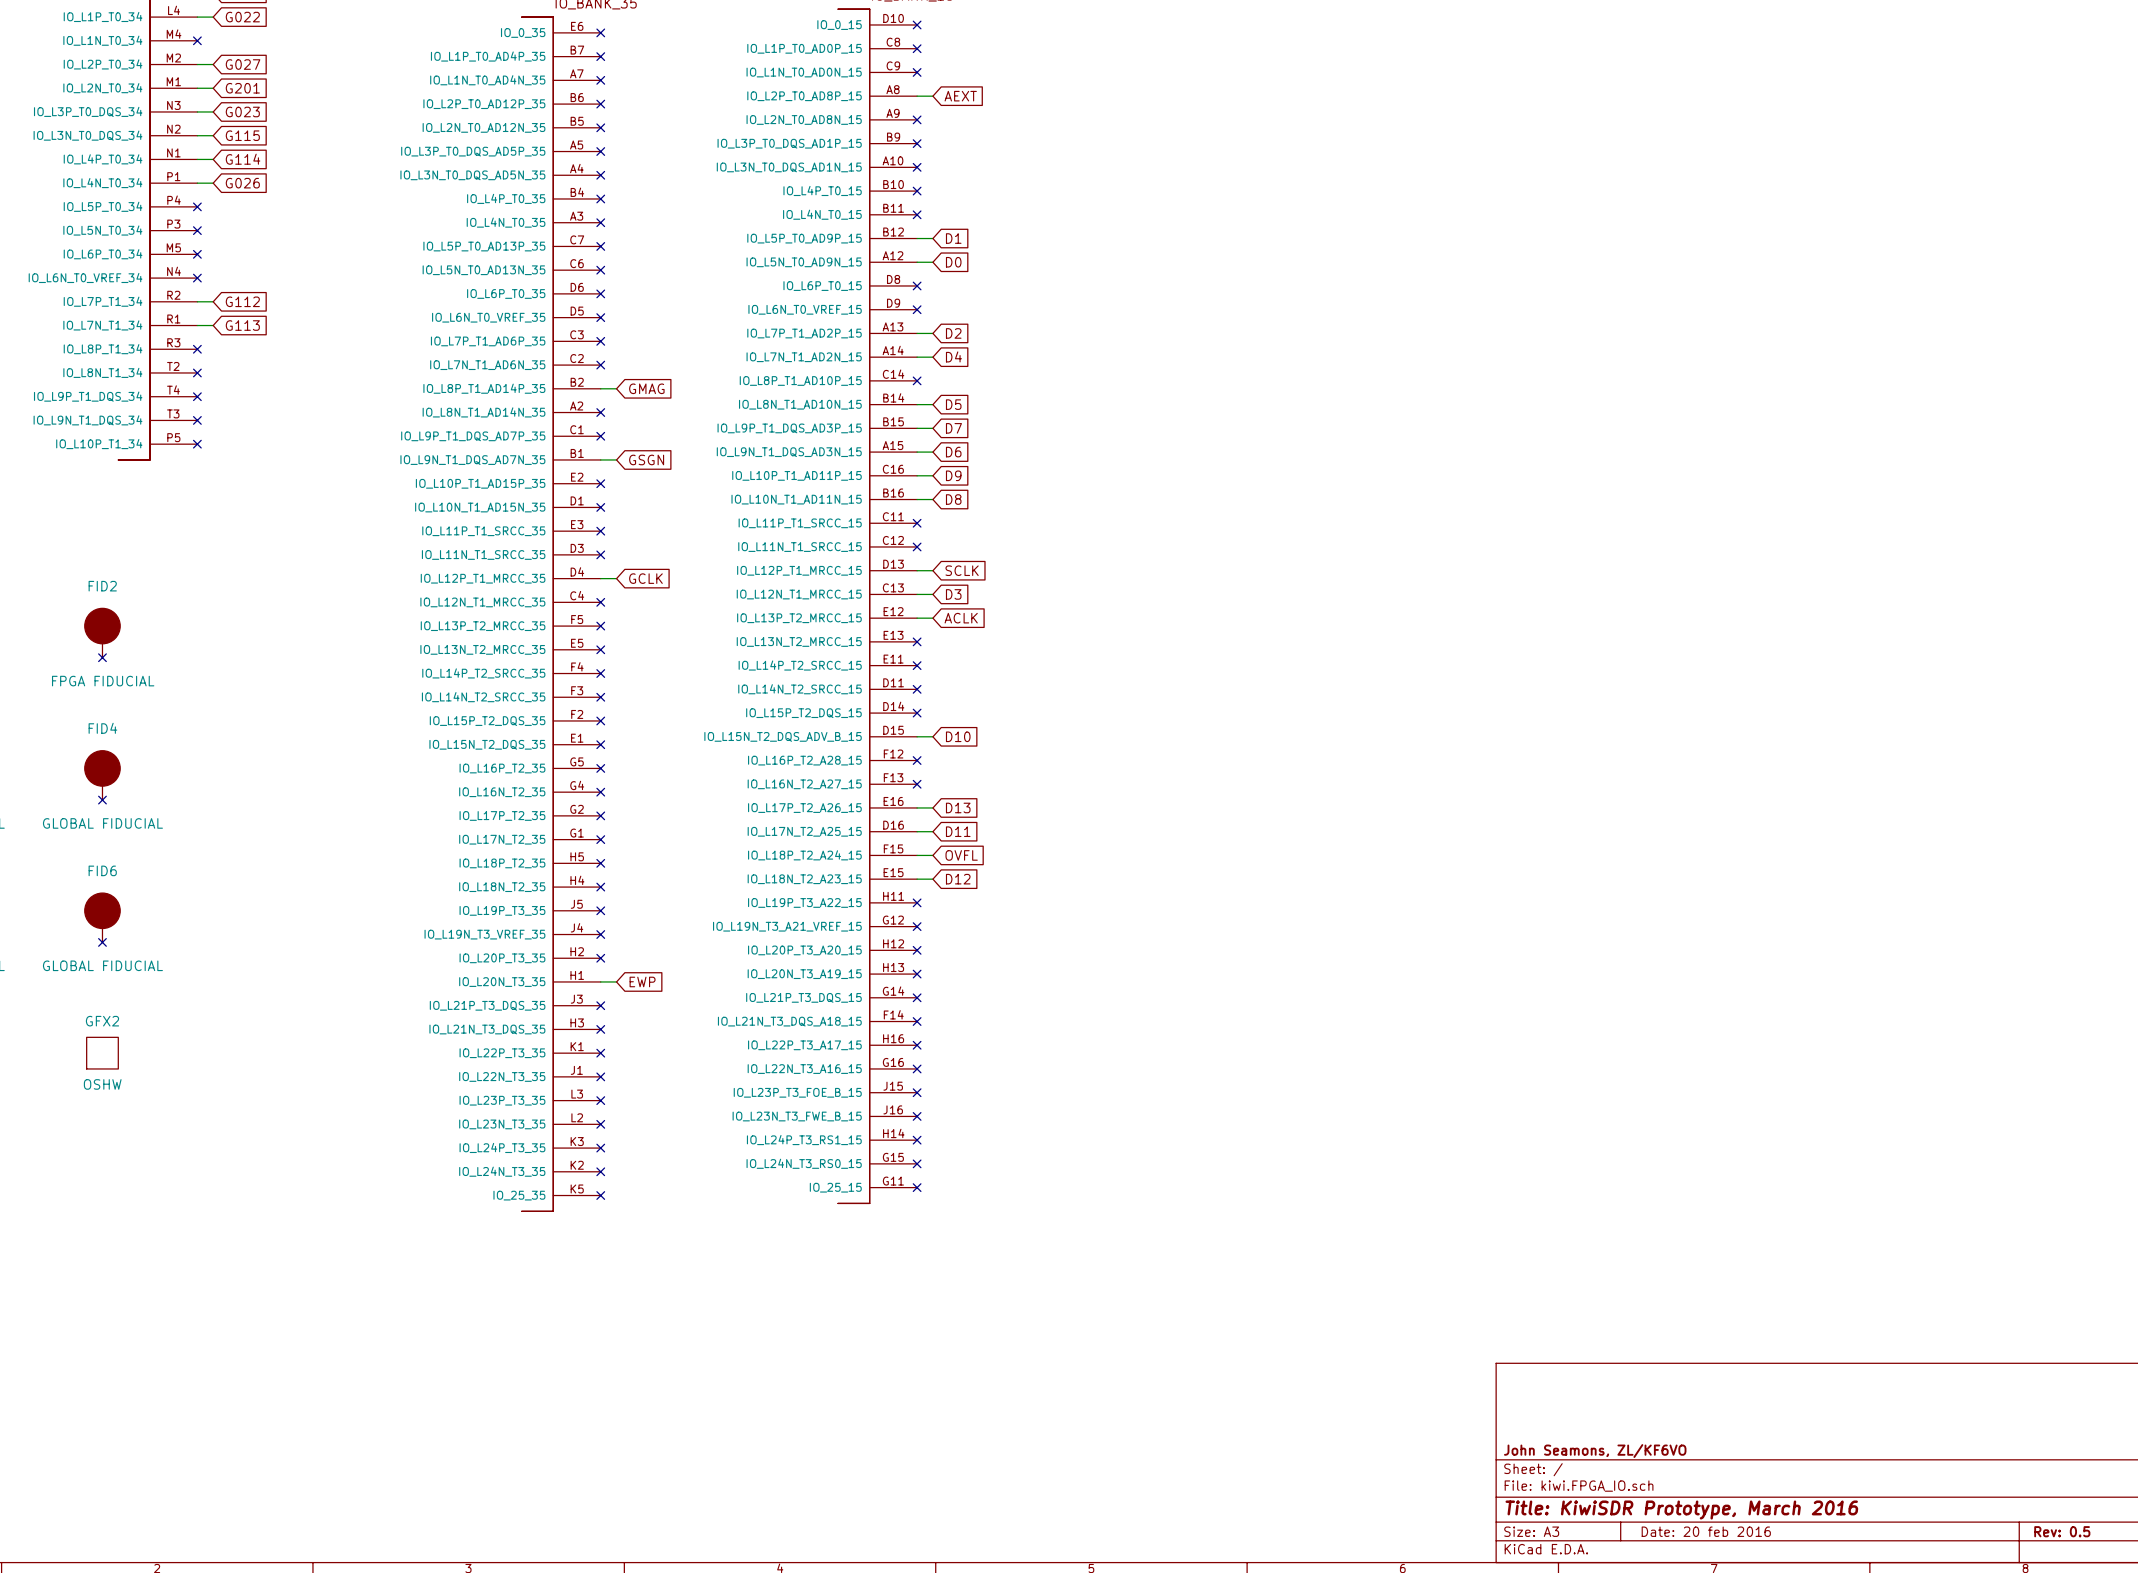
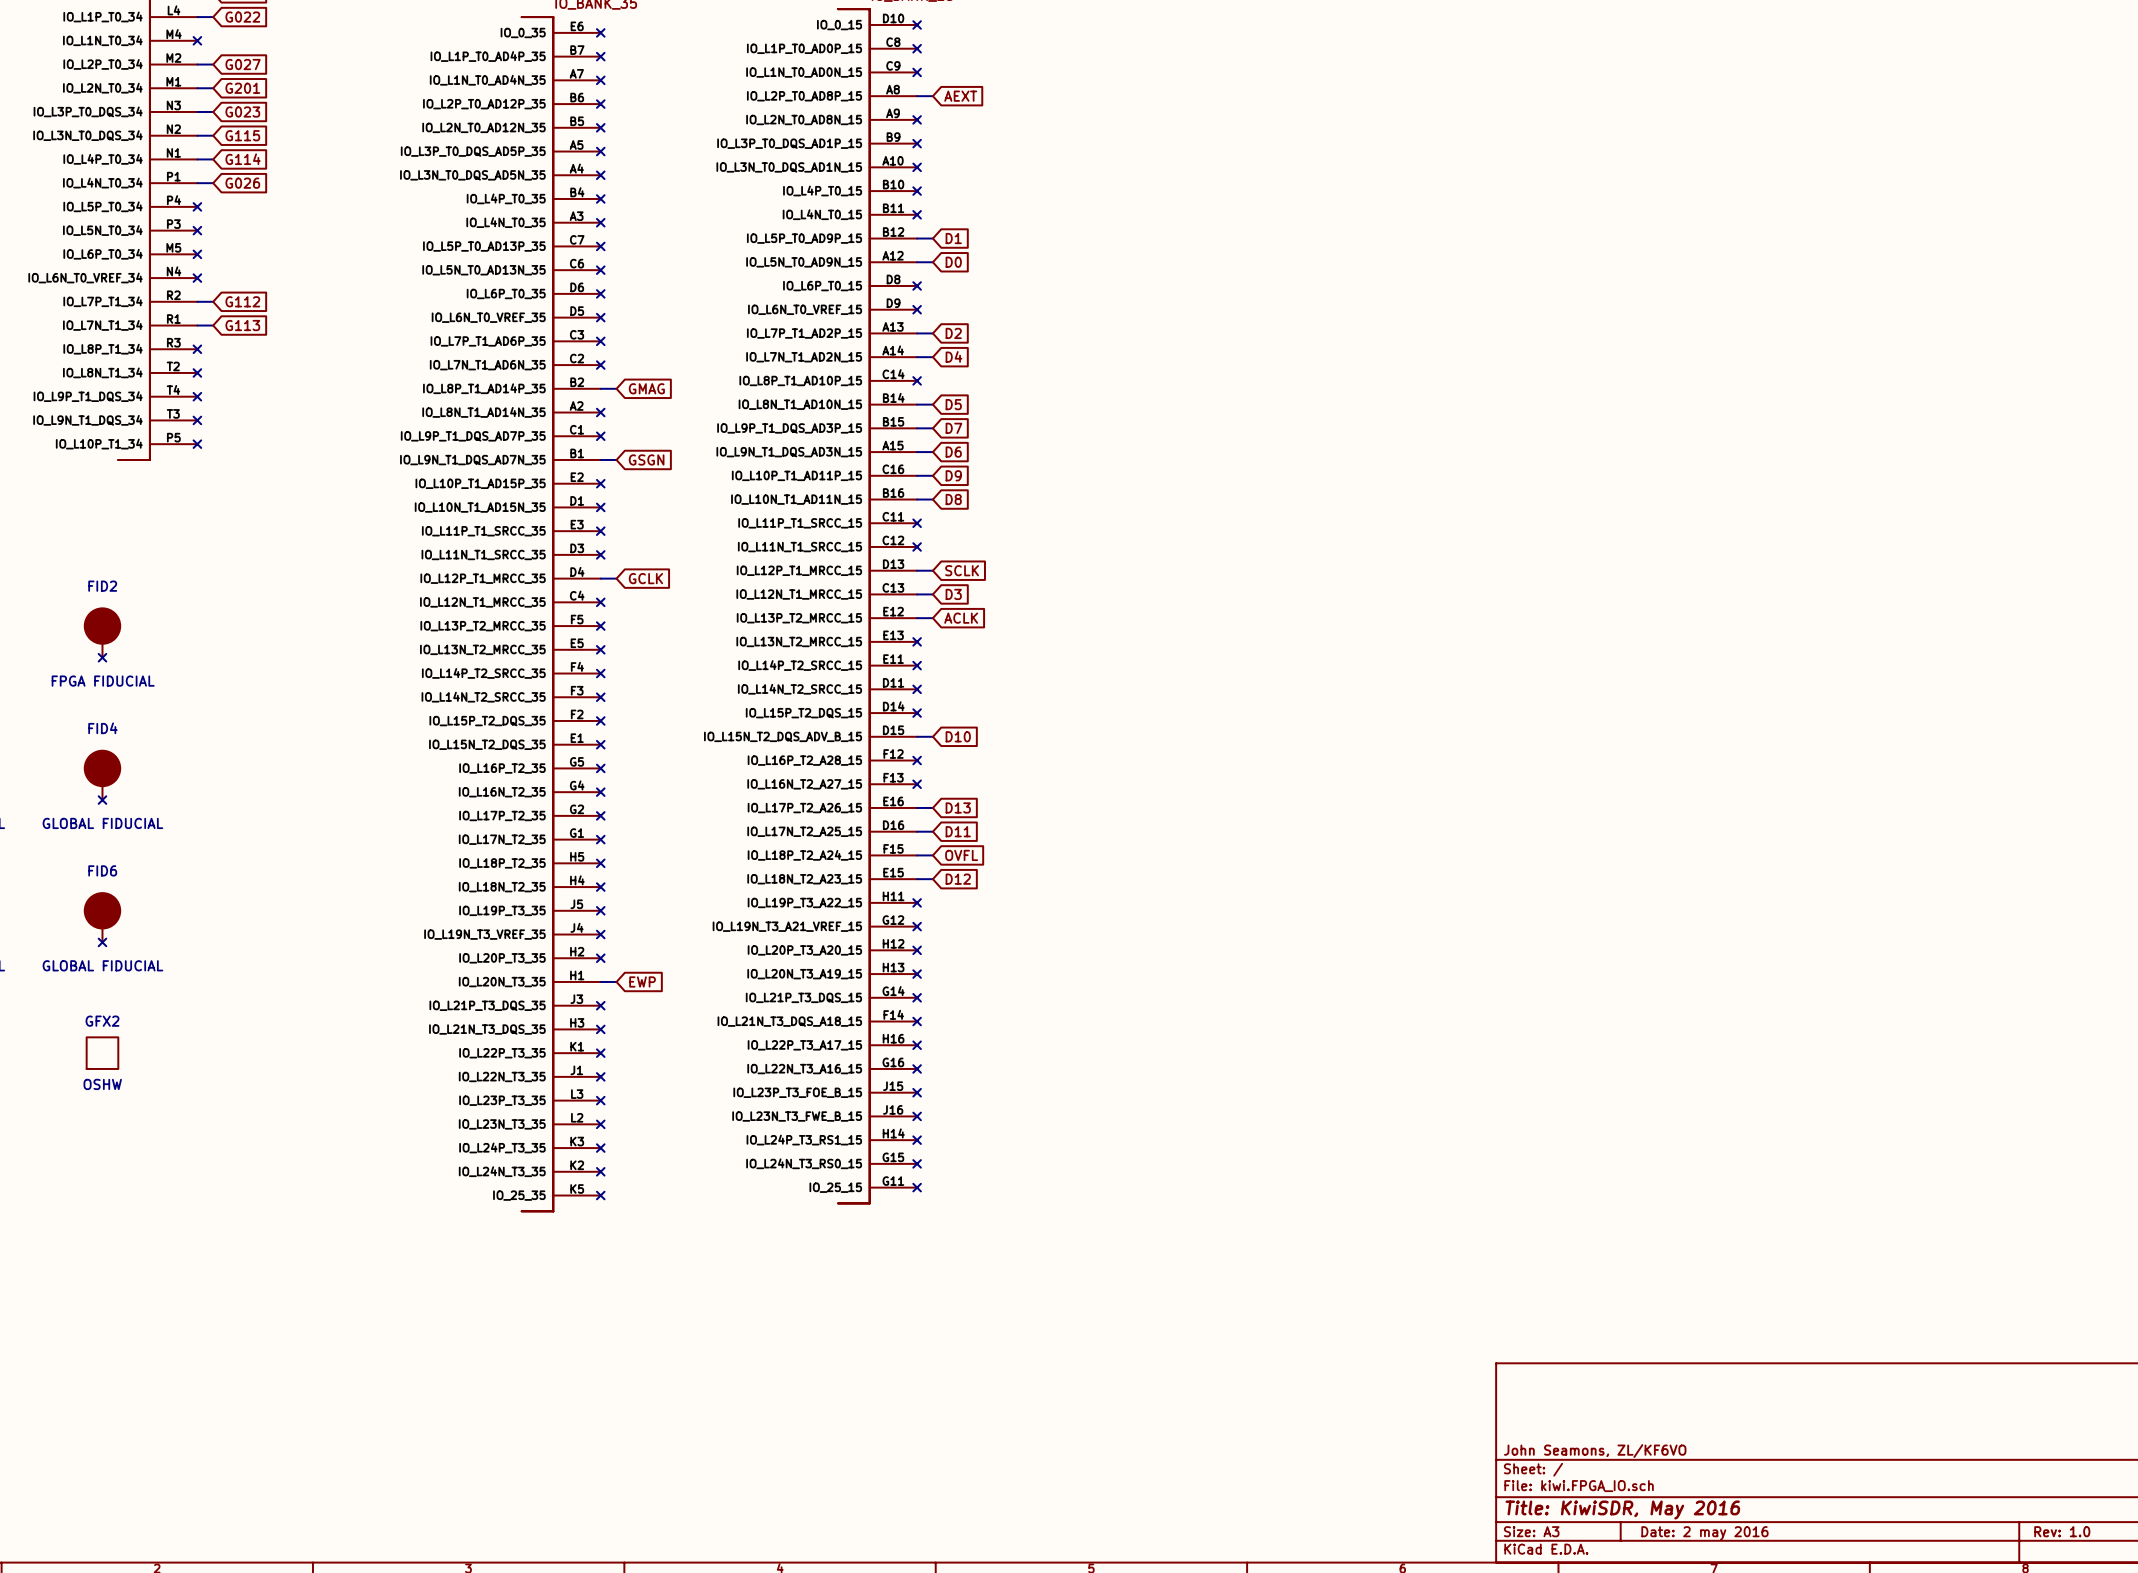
title block: Title: KiwiSDR Prototype, March 2016 (1681, 1510) -> Title: KiwiSDR, May 2016 (1622, 1510)
title block: Date: 20 feb 2016 (1706, 1531) -> Date: 2 may 2016 (1704, 1533)
title block: Rev: 0.5 (2062, 1531) -> Rev: 1.0 (2062, 1531)

